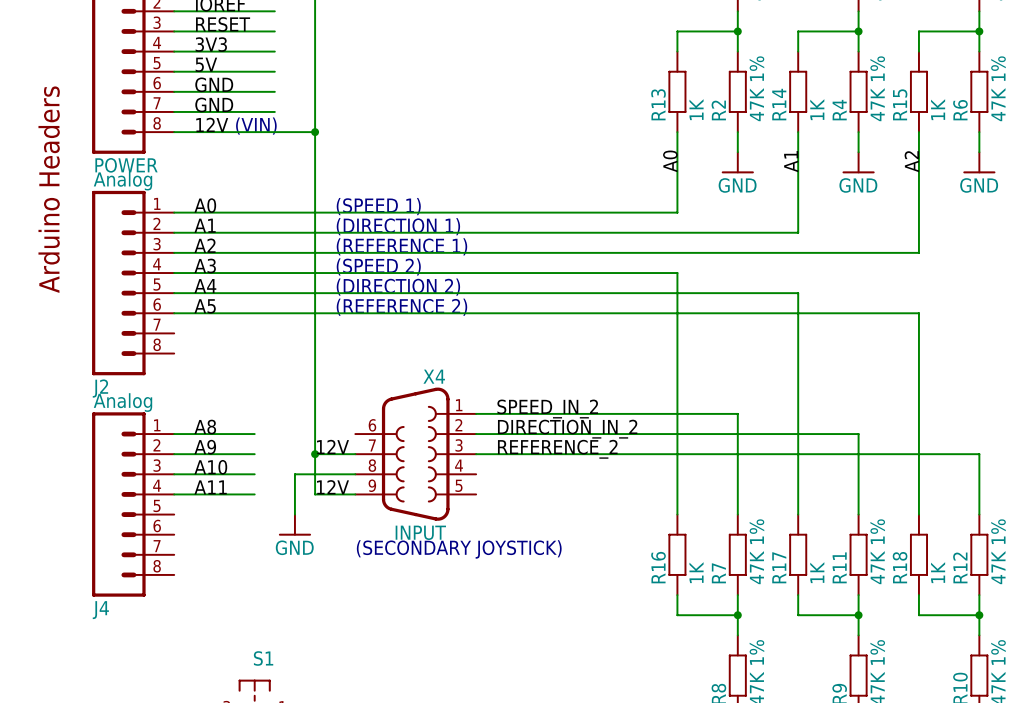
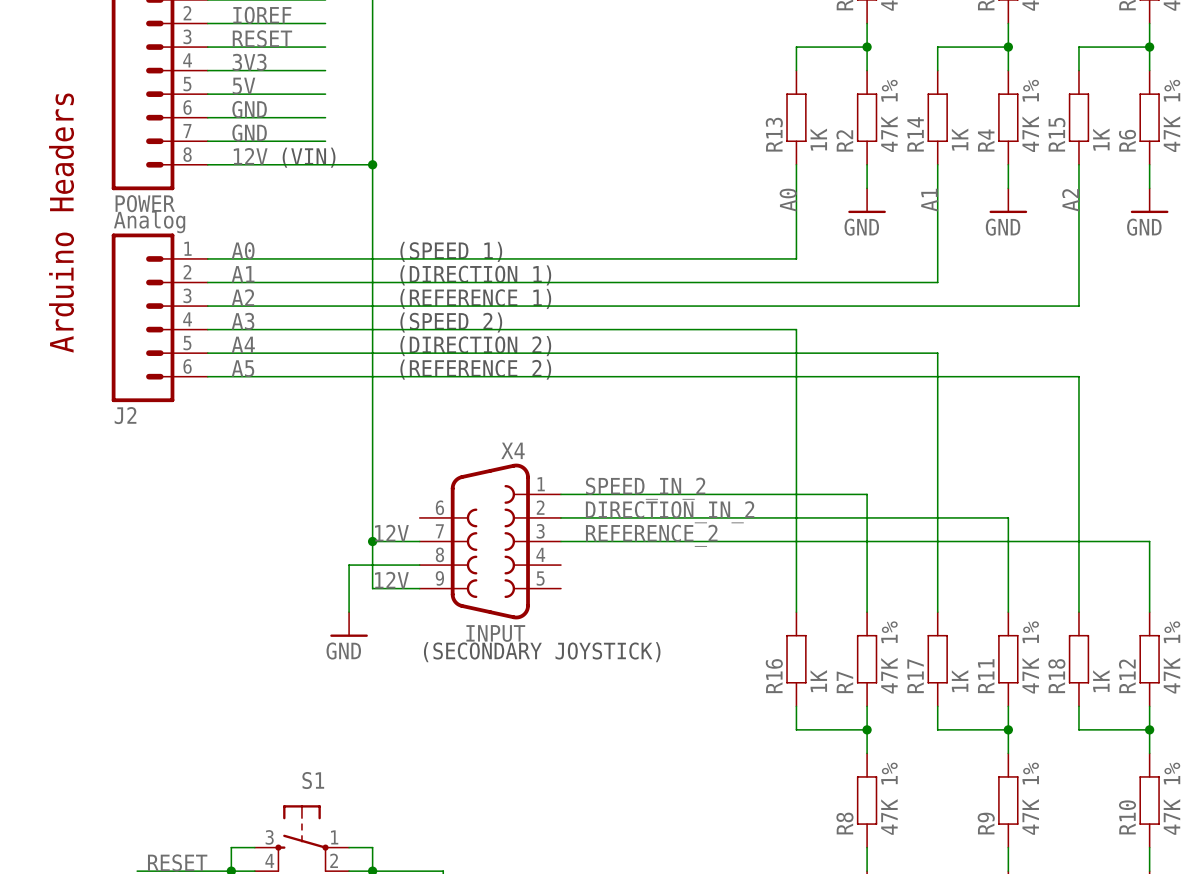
J2 symbol: [92, 190, 175, 376] -> [111, 233, 208, 403]
J2 name position: J2 (100, 388) -> J2 (125, 415)
label: A8 (205, 427) -> none
wire: (174, 434) (254, 434) -> none
label: A9 (205, 447) -> none
wire: (174, 454) (254, 454) -> none
label: A10 (210, 467) -> none
wire: (174, 474) (254, 474) -> none
label: A11 (210, 487) -> none
wire: (174, 494) (254, 494) -> none
J4: Analog (133, 504) -> none

